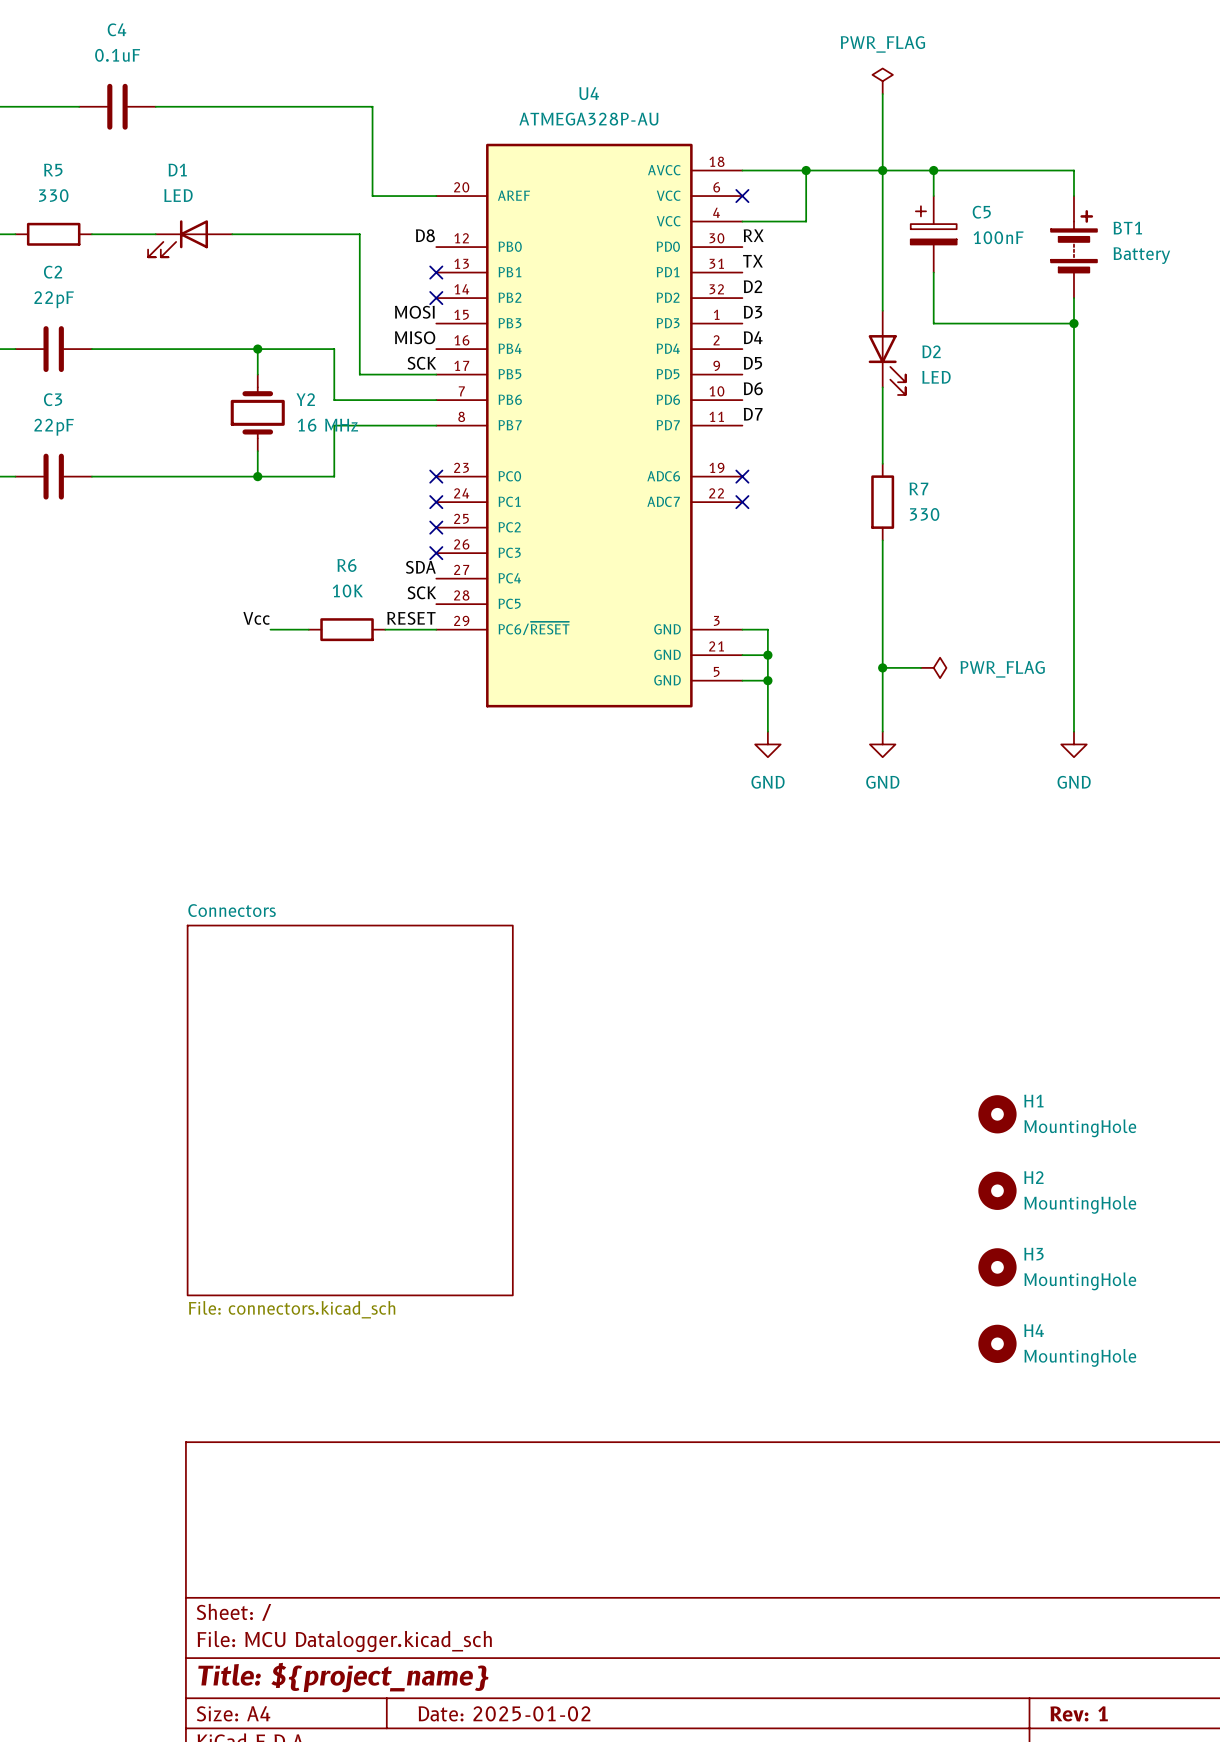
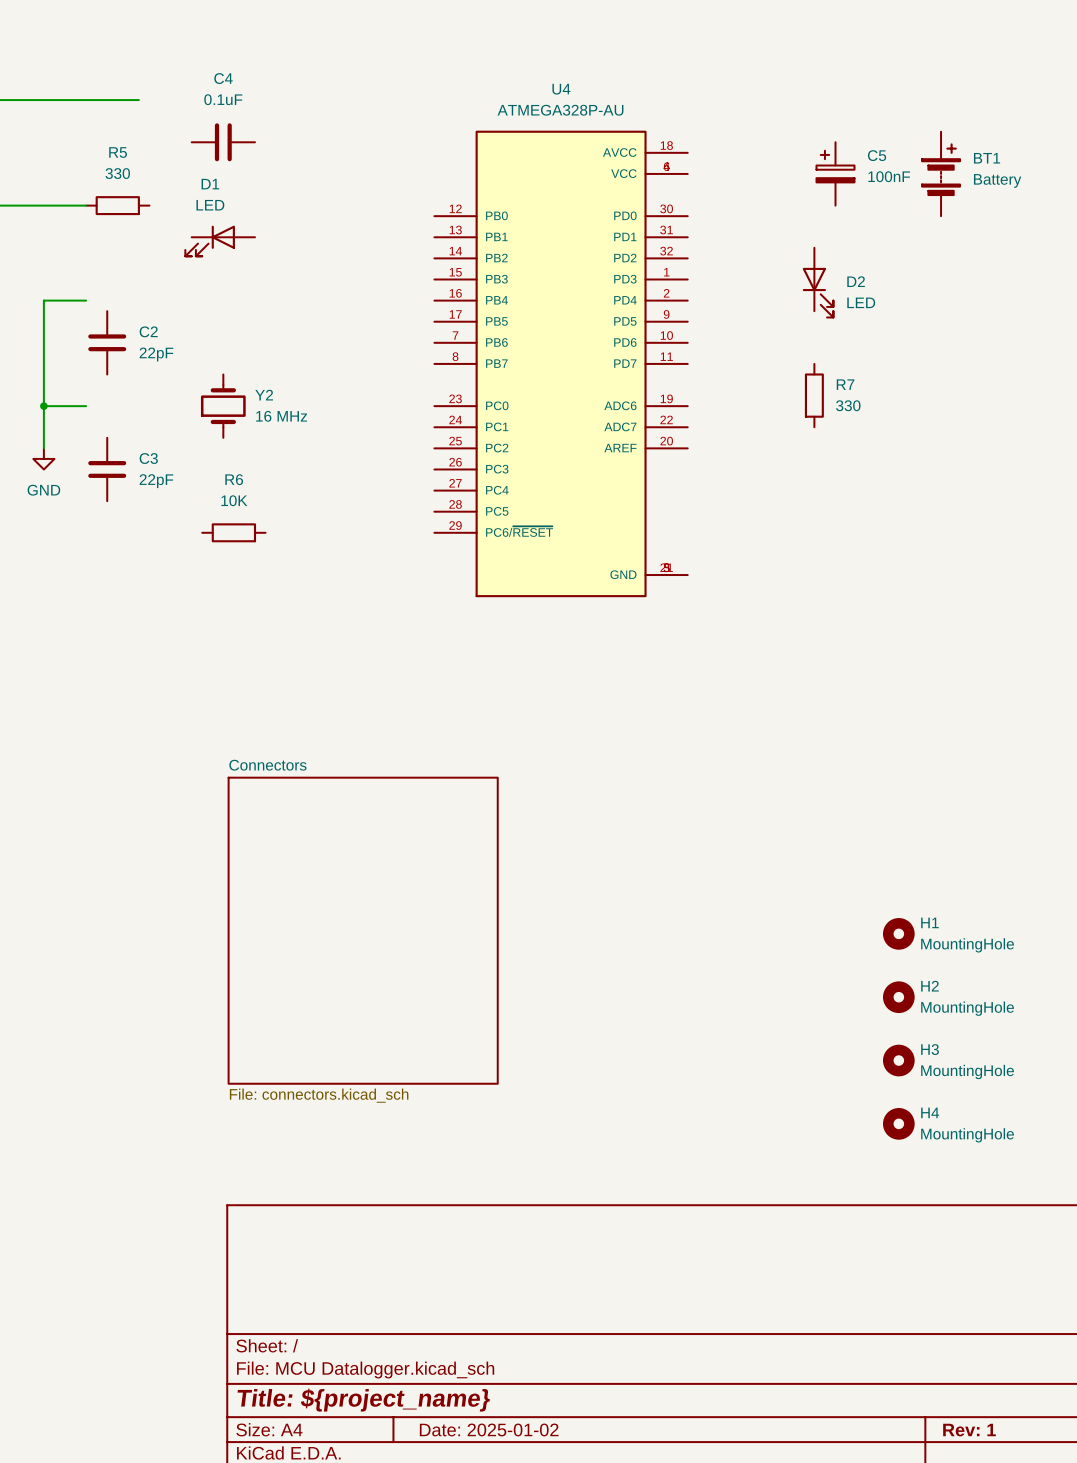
power symbol: PWR_FLAG (882, 81) -> none
wire: (882, 94) (882, 310) -> none
C4 position: (117, 106) -> (223, 142)
wire: (155, 106) (372, 106) (372, 196) (436, 196) -> none
U4 symbol: [436, 143, 743, 708] -> [434, 130, 688, 598]
wire: (742, 170) (1073, 170) (1073, 196) -> none
wire: (806, 170) (806, 221) (742, 221) -> none
junction: (806, 170) -> none
junction: (882, 170) -> none
wire: (933, 170) (933, 196) -> none
junction: (933, 170) -> none
no-connect mark: (742, 196) -> none
wire: (91, 234) (155, 234) -> none
wire: (232, 234) (359, 234) (359, 374) (436, 374) -> none
C5 position: (933, 234) -> (835, 173)
label: D8 (425, 235) -> none
label: RX (753, 235) -> none
D1 position: (190, 238) -> (220, 240)
BT1 position: (1073, 247) -> (941, 173)
label: TX (752, 261) -> none
C2 name position: C2 (53, 272) -> C2 (148, 331)
no-connect mark: (436, 272) -> none
wire: (933, 272) (933, 323) (1073, 323) -> none
label: D2 (752, 286) -> none
no-connect mark: (436, 298) -> none
wire: (1073, 298) (1073, 731) -> none
label: MOSI (414, 312) -> none
label: D3 (753, 312) -> none
junction: (1073, 323) -> none
label: MISO (415, 337) -> none
label: D4 (753, 337) -> none
C2 rotation: 0° (53, 349) -> 90° clockwise (107, 342)
C2 position: (53, 349) -> (107, 342)
wire: (91, 349) (334, 349) (334, 400) (436, 400) -> none
wire: (257, 349) (257, 374) -> none
junction: (257, 349) -> none
D2 position: (887, 352) -> (818, 282)
label: SCK (421, 363) -> none
label: D5 (752, 363) -> none
wire: (882, 387) (882, 463) -> none
label: D6 (753, 388) -> none
C3 name position: C3 (53, 399) -> C3 (148, 458)
Y2 position: (257, 412) -> (223, 406)
label: D7 (753, 414) -> none
wire: (436, 425) (334, 425) (334, 476) (91, 476) -> none
wire: (257, 451) (257, 476) -> none
C3 rotation: 0° (53, 476) -> 90° clockwise (107, 469)
C3 position: (53, 476) -> (107, 469)
junction: (257, 476) -> none
no-connect mark: (436, 476) -> none
no-connect mark: (742, 476) -> none
no-connect mark: (436, 502) -> none
no-connect mark: (742, 502) -> none
R7 position: (882, 502) -> (814, 395)
no-connect mark: (436, 527) -> none
wire: (882, 540) (882, 731) -> none
no-connect mark: (436, 553) -> none
label: SDA (420, 567) -> none
label: SCK (421, 592) -> none
label: Vcc (256, 618) -> none
label: RESET (411, 618) -> none
wire: (270, 629) (308, 629) -> none
R6 position: (347, 629) -> (233, 532)
wire: (385, 629) (436, 629) -> none
wire: (742, 629) (767, 629) (767, 731) -> none
wire: (742, 655) (767, 655) -> none
junction: (767, 655) -> none
wire: (882, 667) (920, 667) -> none
junction: (882, 667) -> none
power symbol: PWR_FLAG (933, 667) -> none
wire: (742, 680) (767, 680) -> none
junction: (767, 680) -> none
power symbol: GND (767, 744) -> none
power symbol: GND (882, 744) -> none
power symbol: GND (1073, 744) -> none

